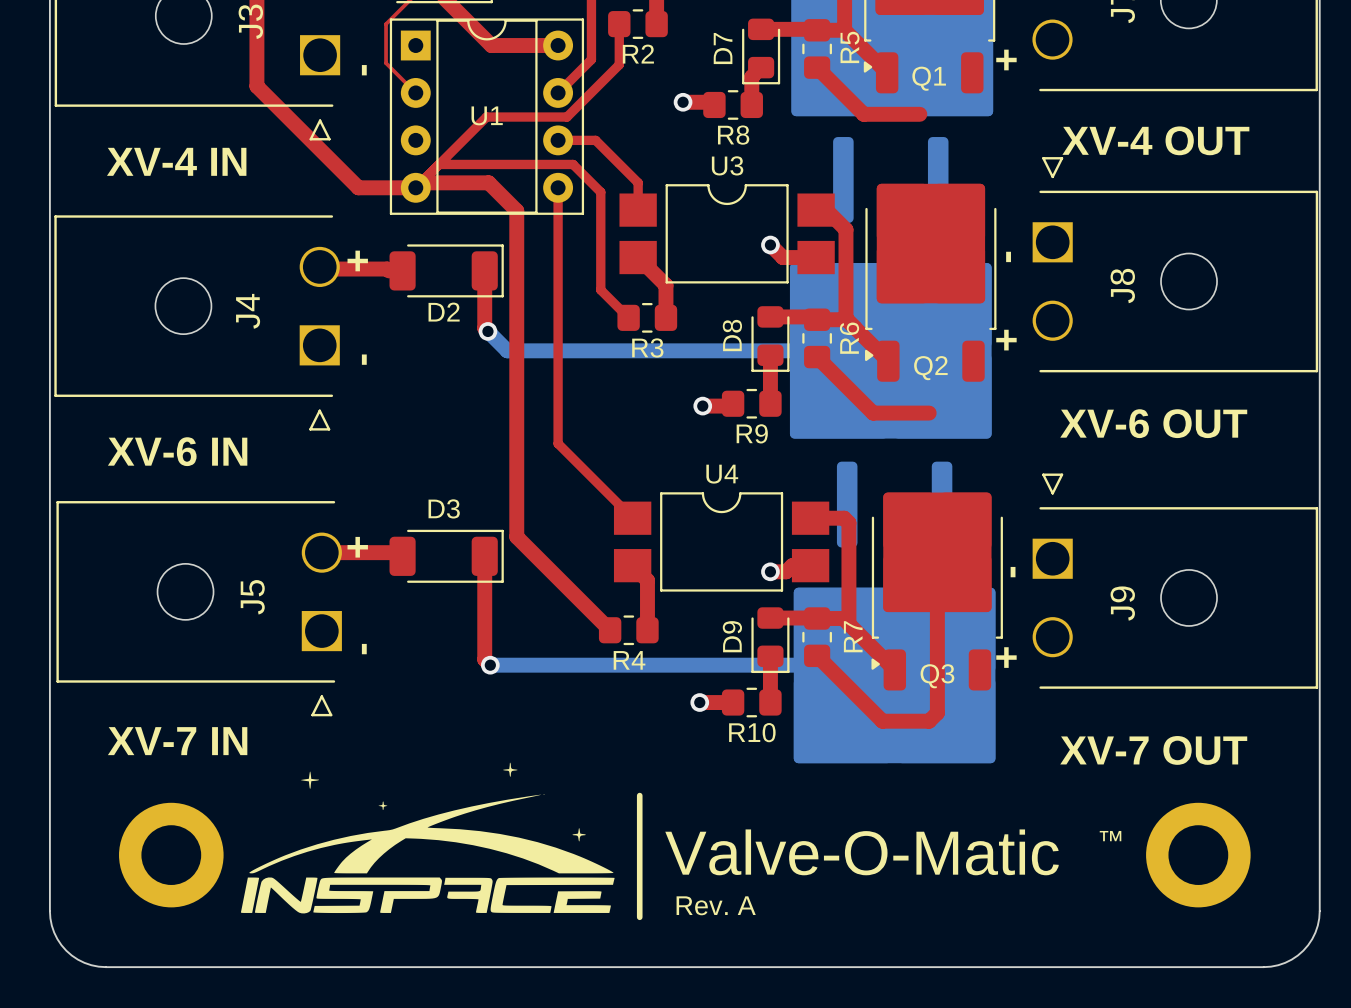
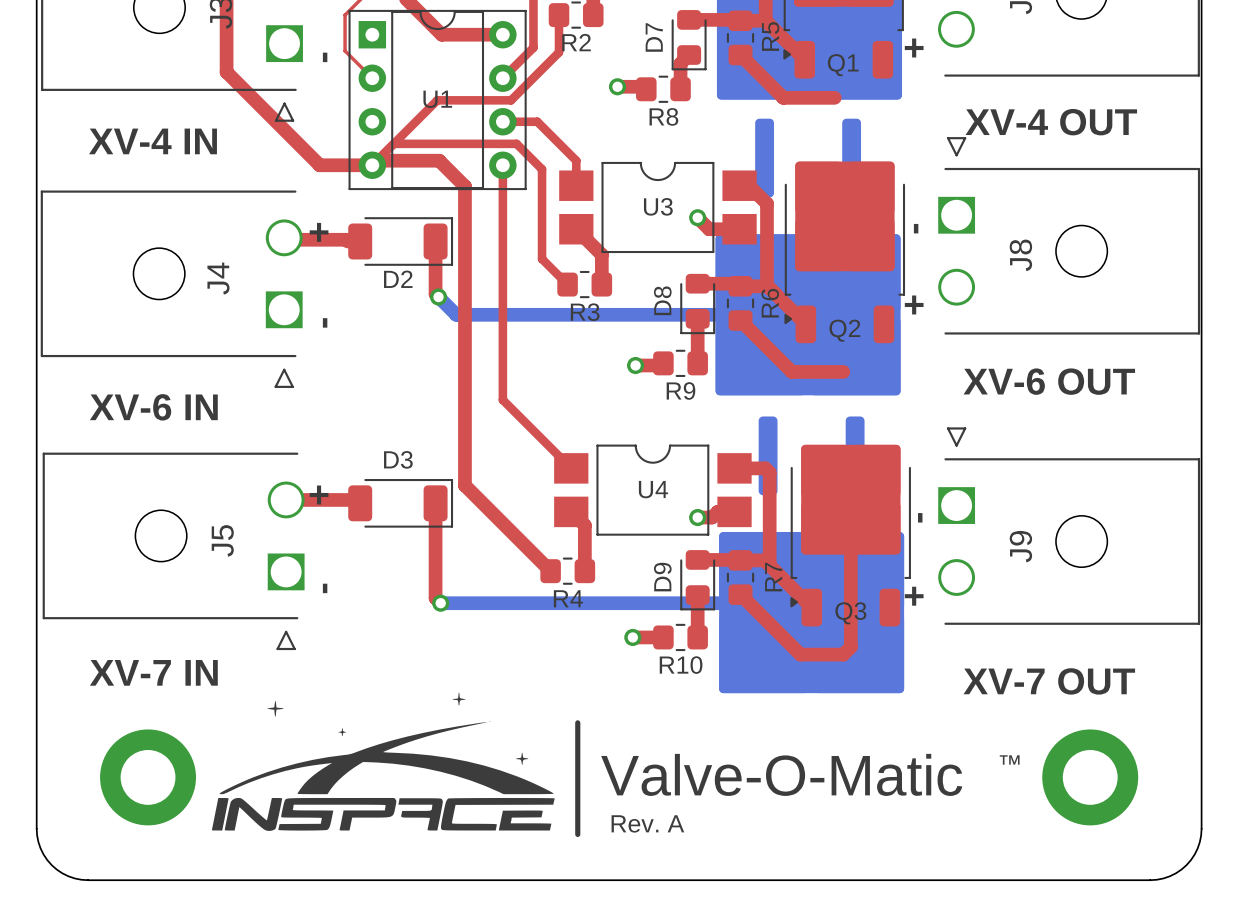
U3 name position: U3 (727, 165) -> U3 (658, 206)
U4 name position: U4 (722, 474) -> U4 (653, 489)

